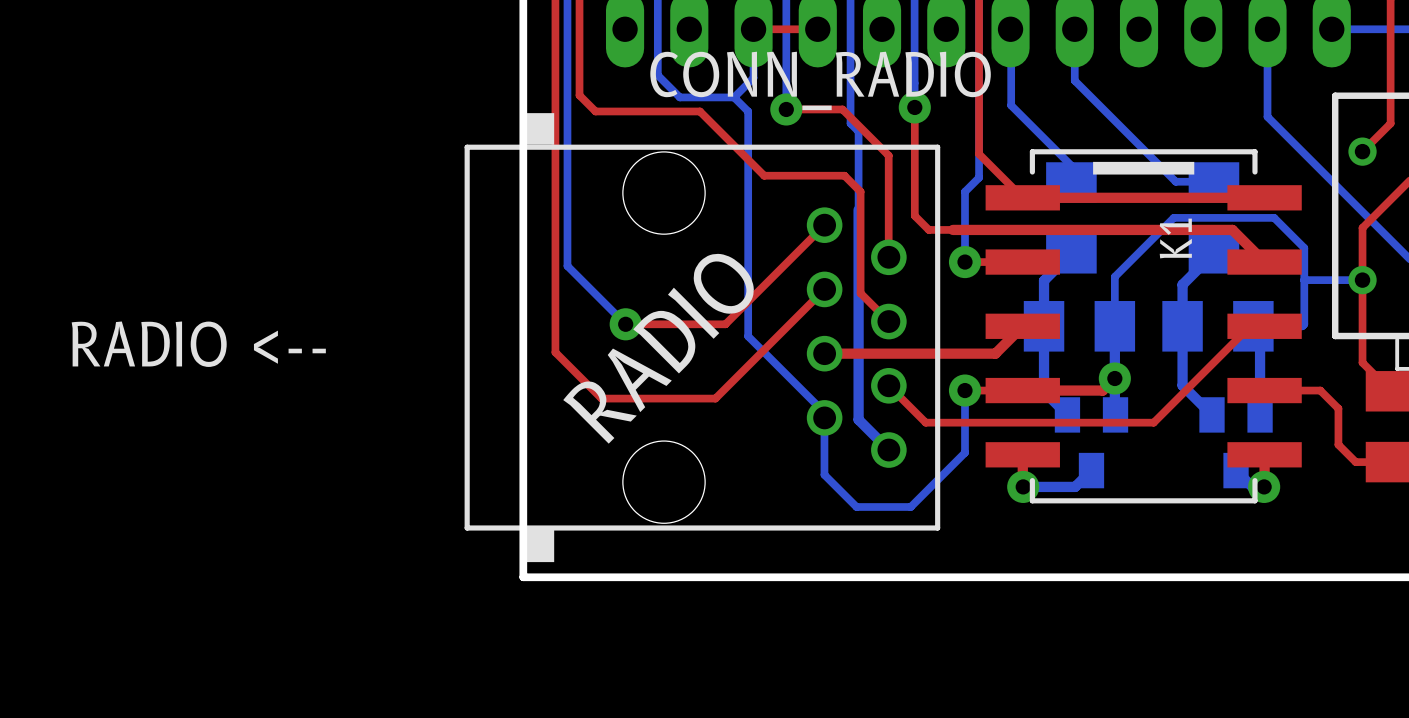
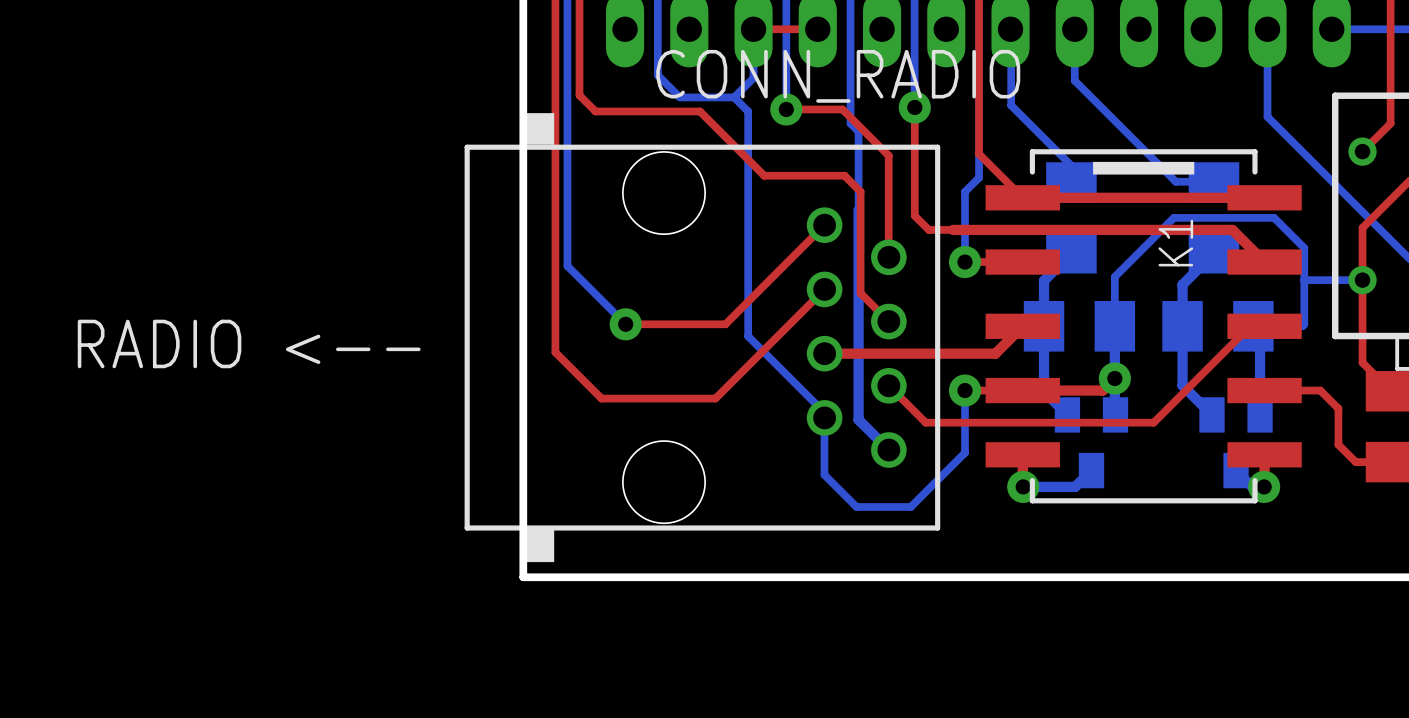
text: RADIO (658, 348) -> none

